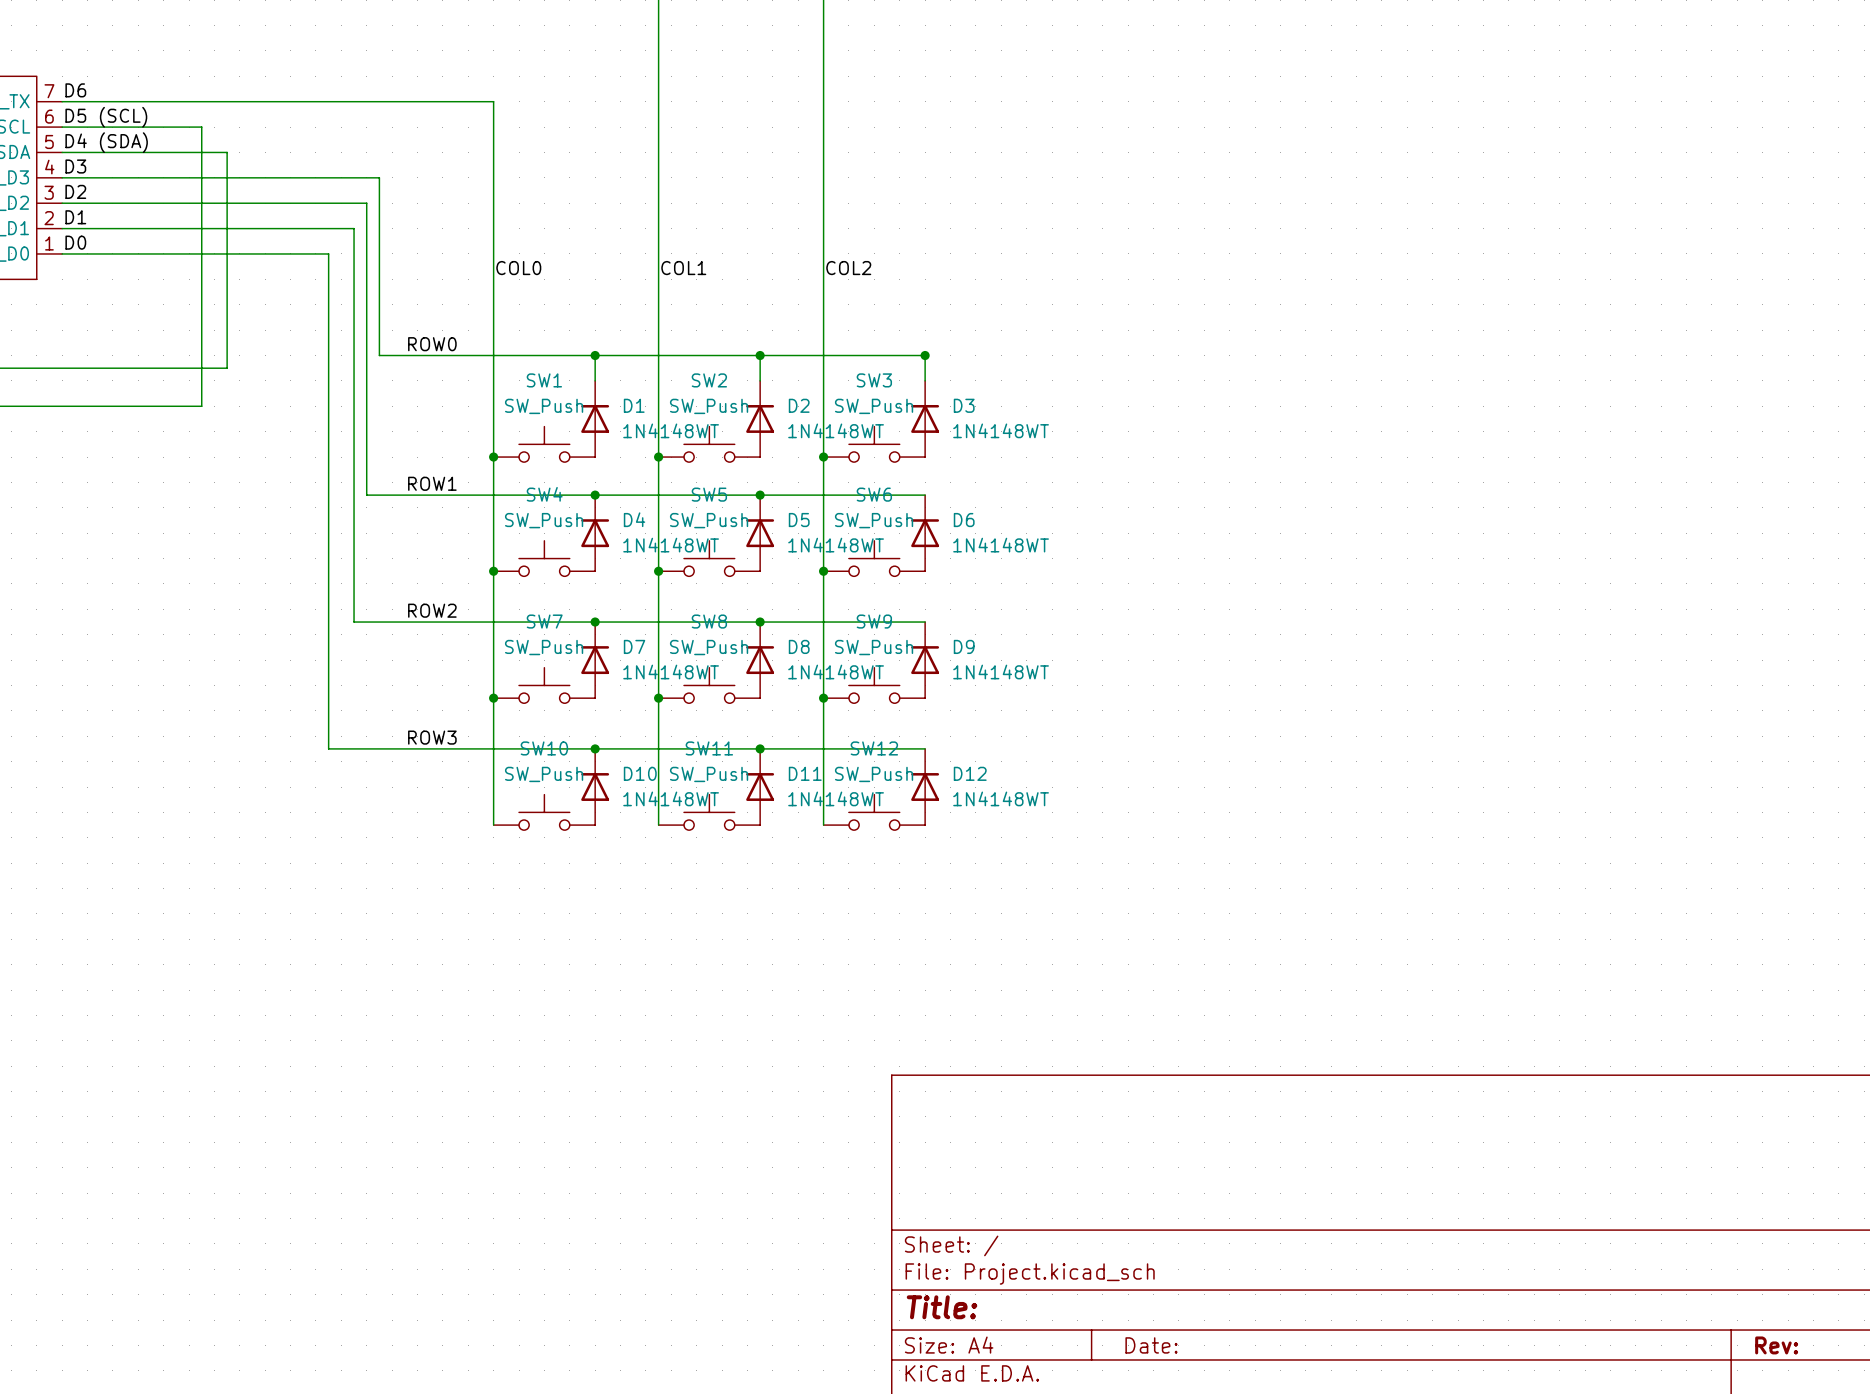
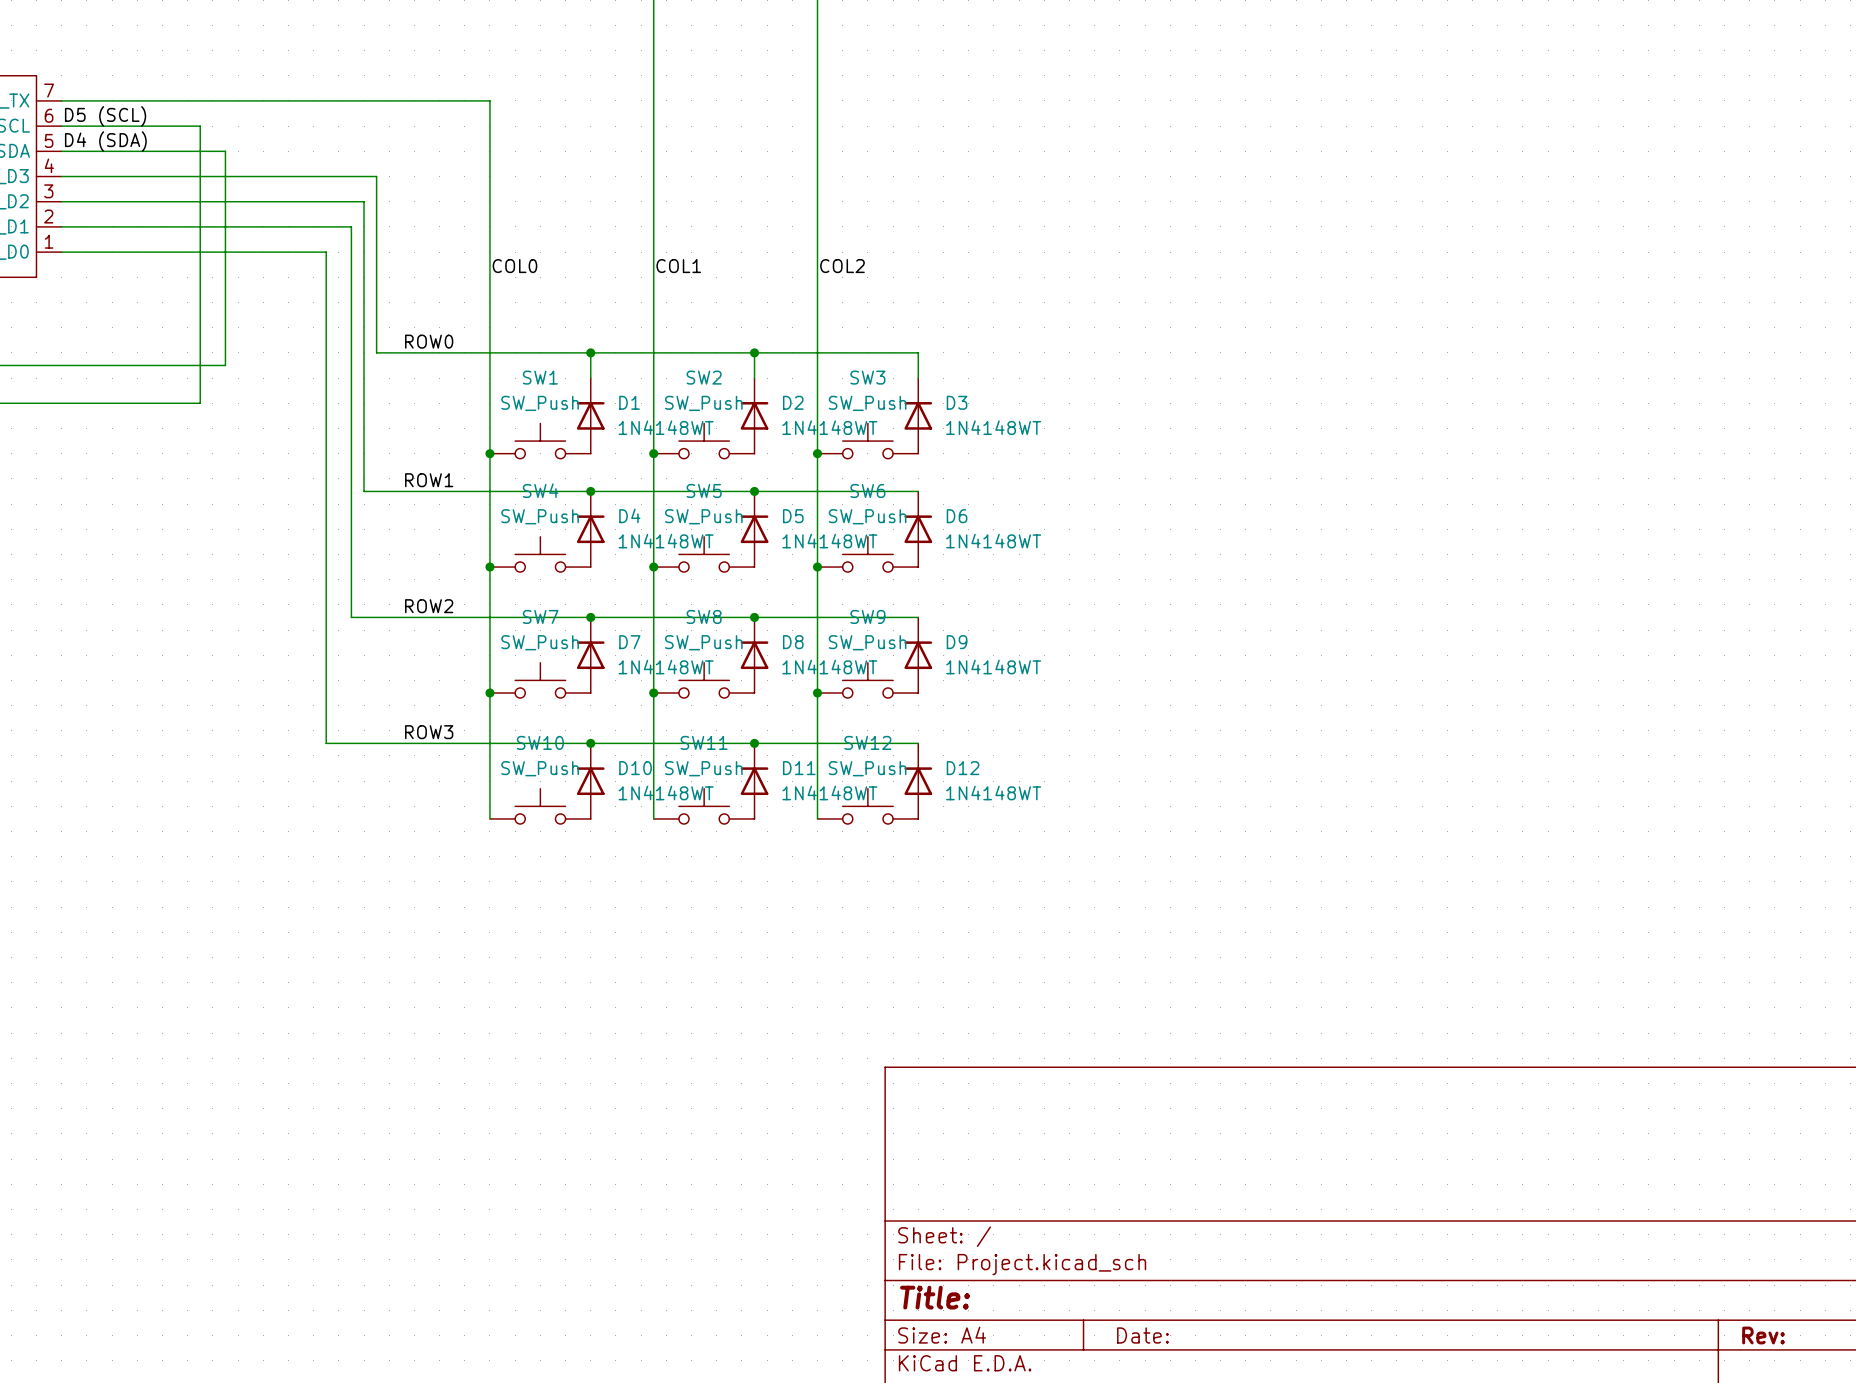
label: D6 (75, 90) -> none
label: D3 (75, 166) -> none
label: D2 (75, 191) -> none
label: D1 (75, 217) -> none
label: D0 (75, 242) -> none
junction: (925, 355) -> none

